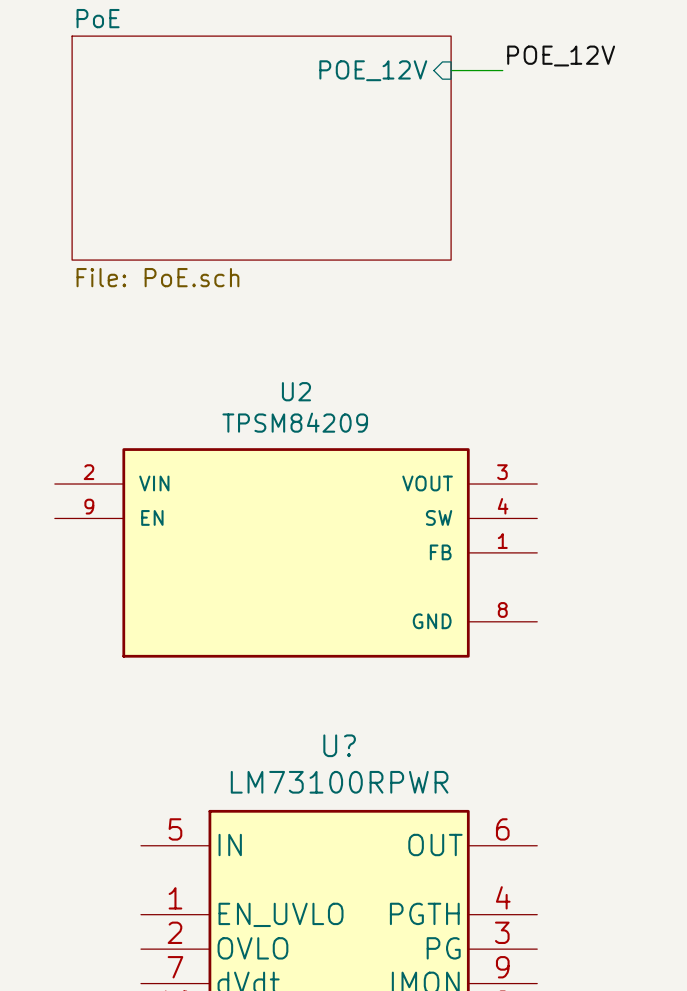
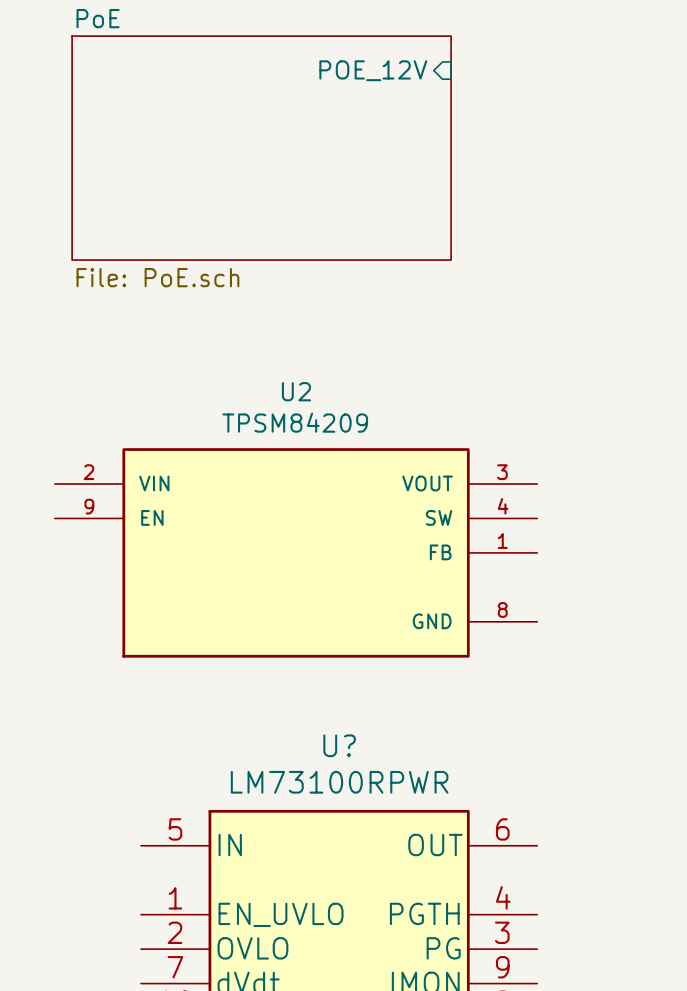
label: POE_12V (561, 56) -> none
wire: (451, 70) (502, 70) -> none

